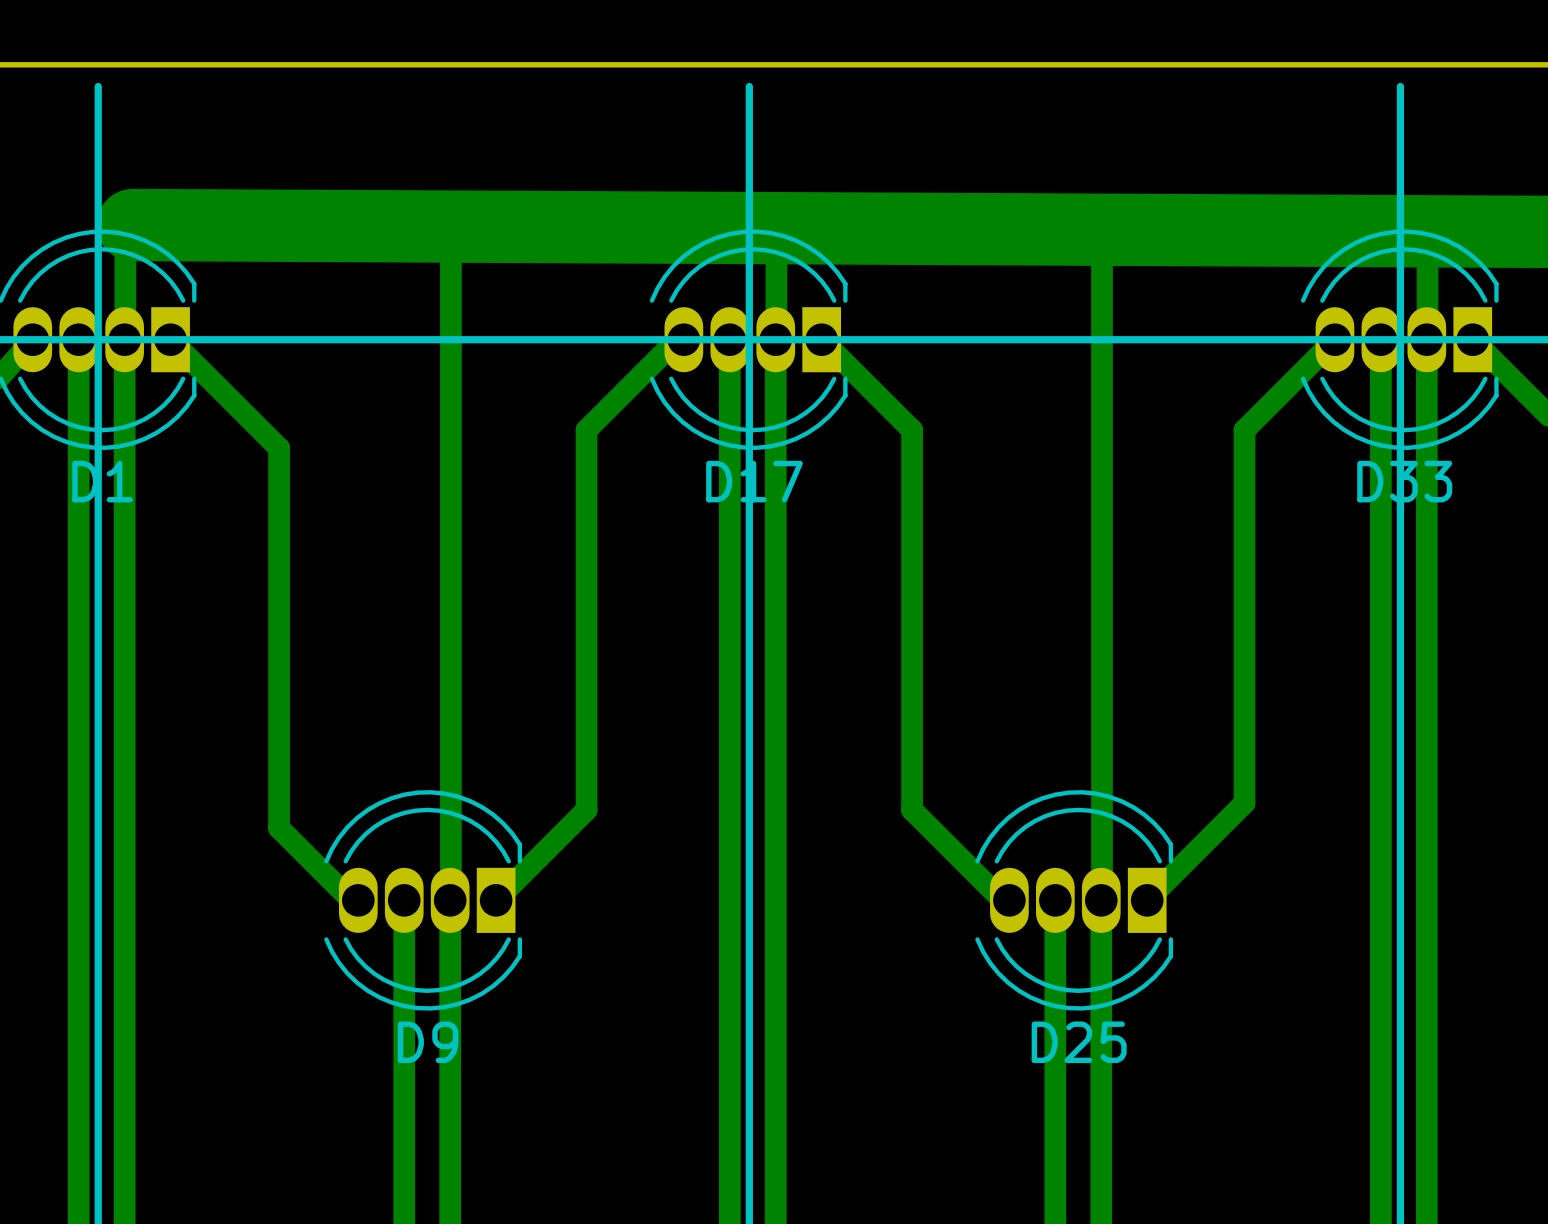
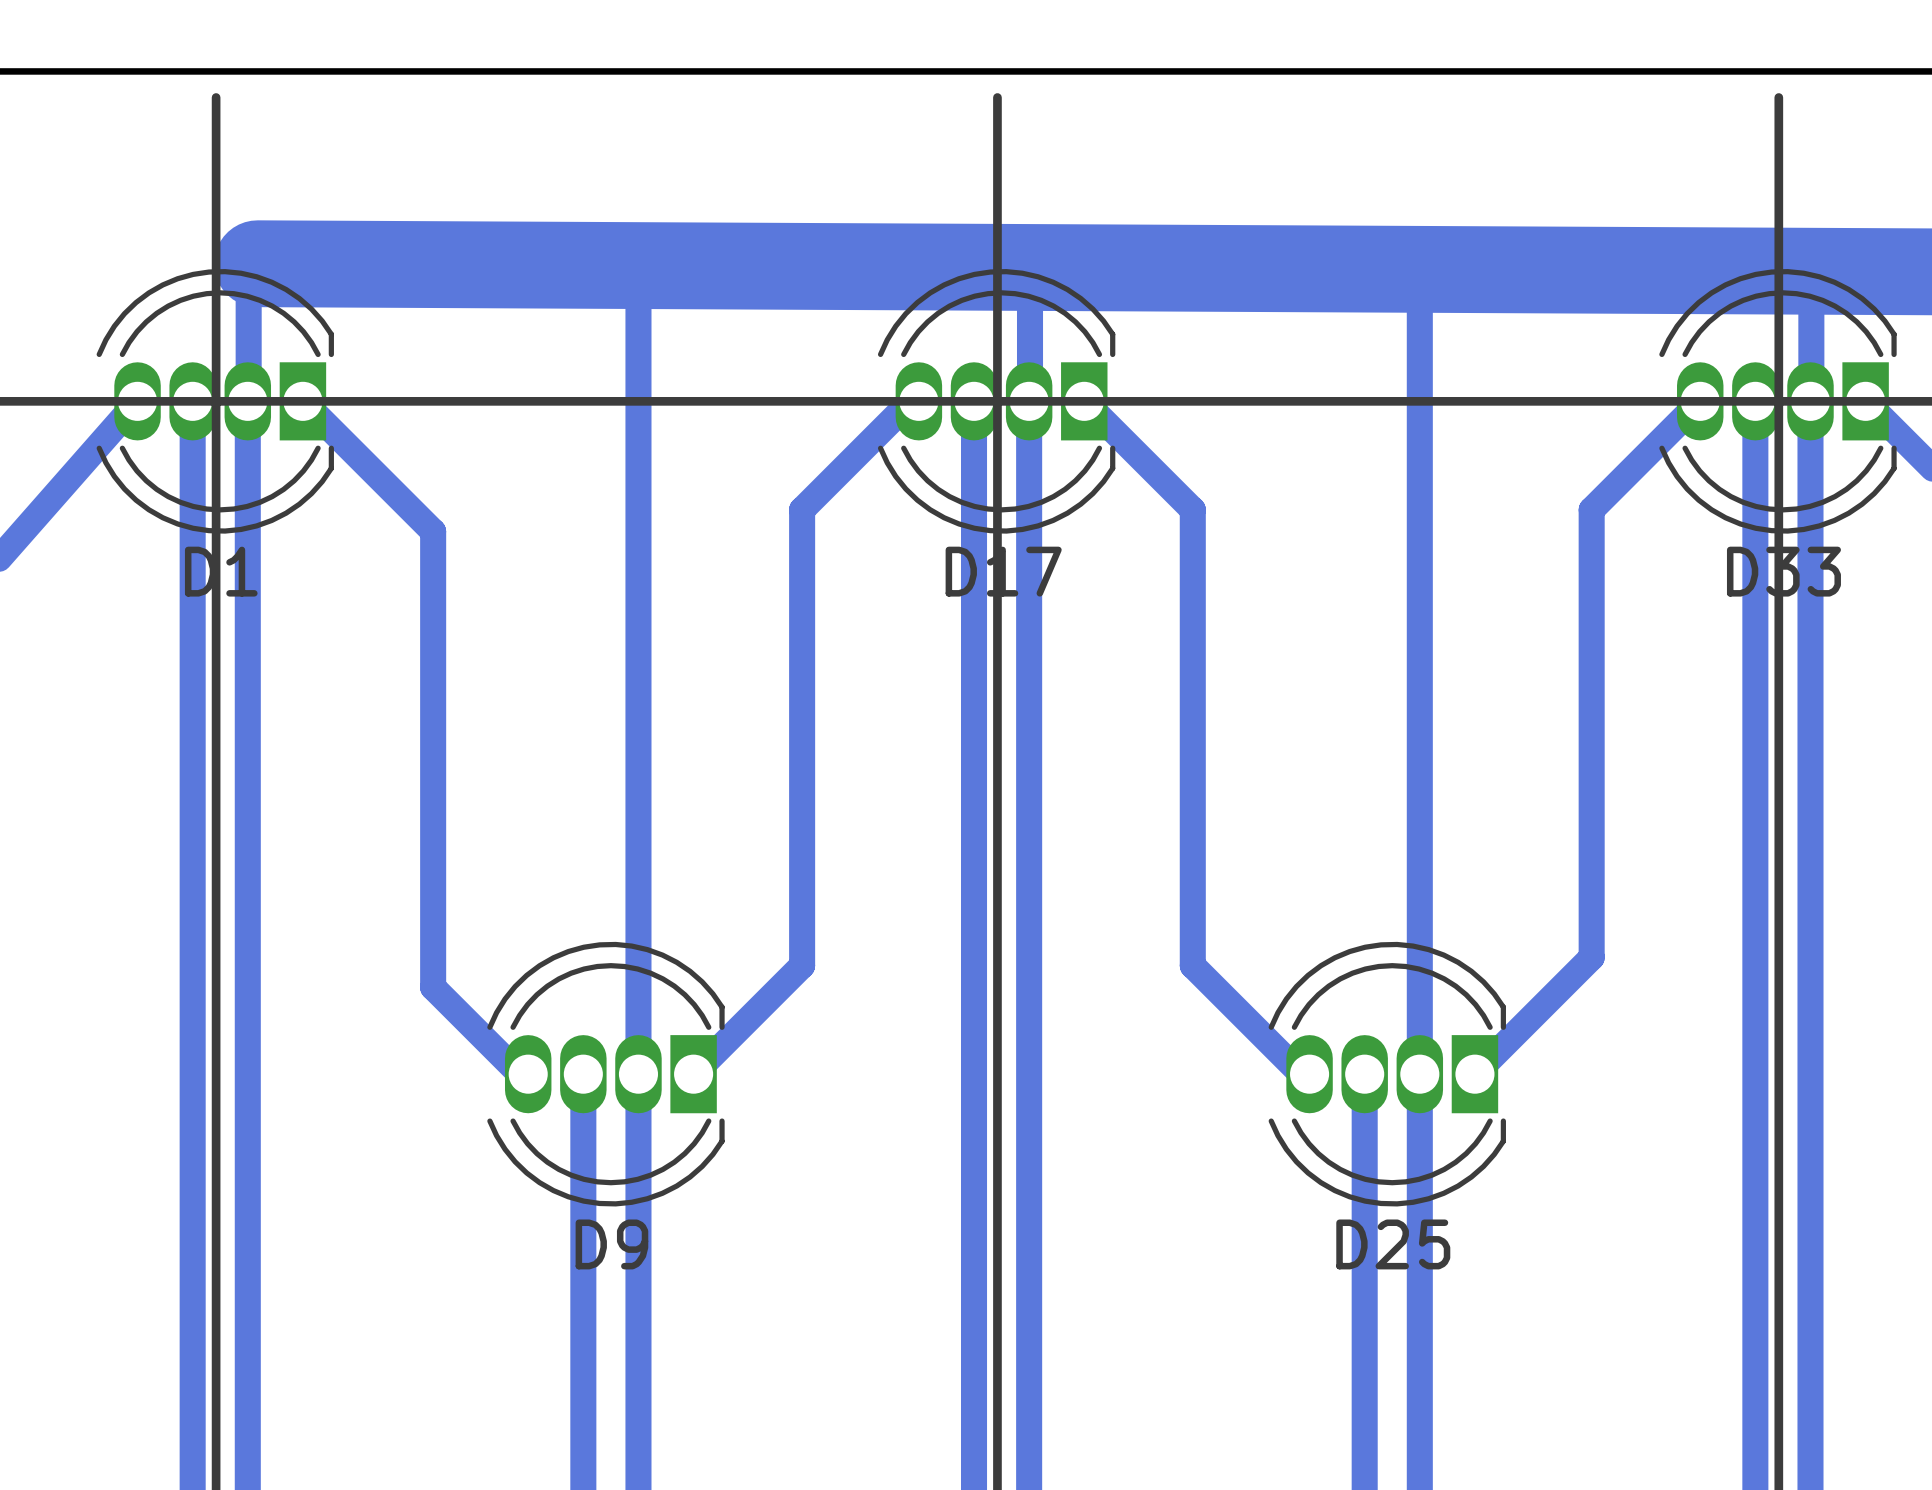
bottom track: (450, 249) (450, 899) -> (643, 265) (638, 270) (638, 1074)
bottom track: (1102, 249) (1102, 899) -> (1415, 269) (1419, 273) (1419, 1074)

